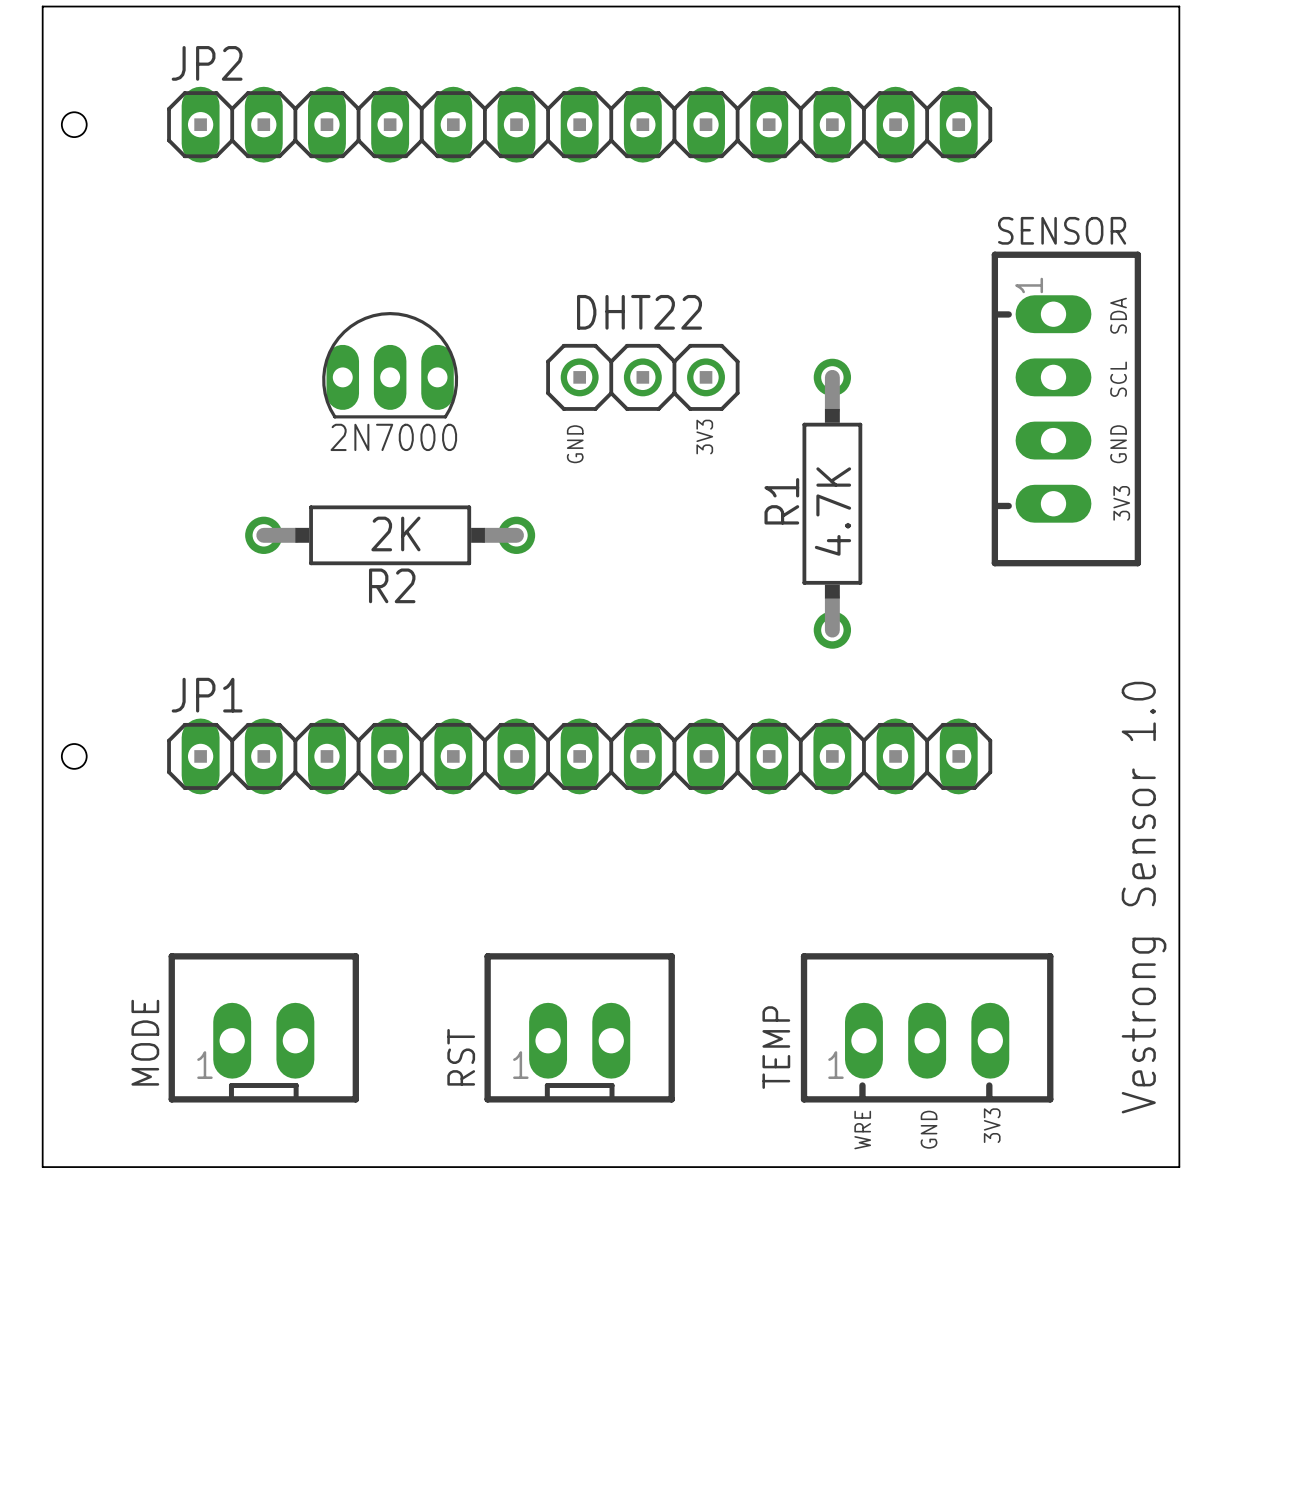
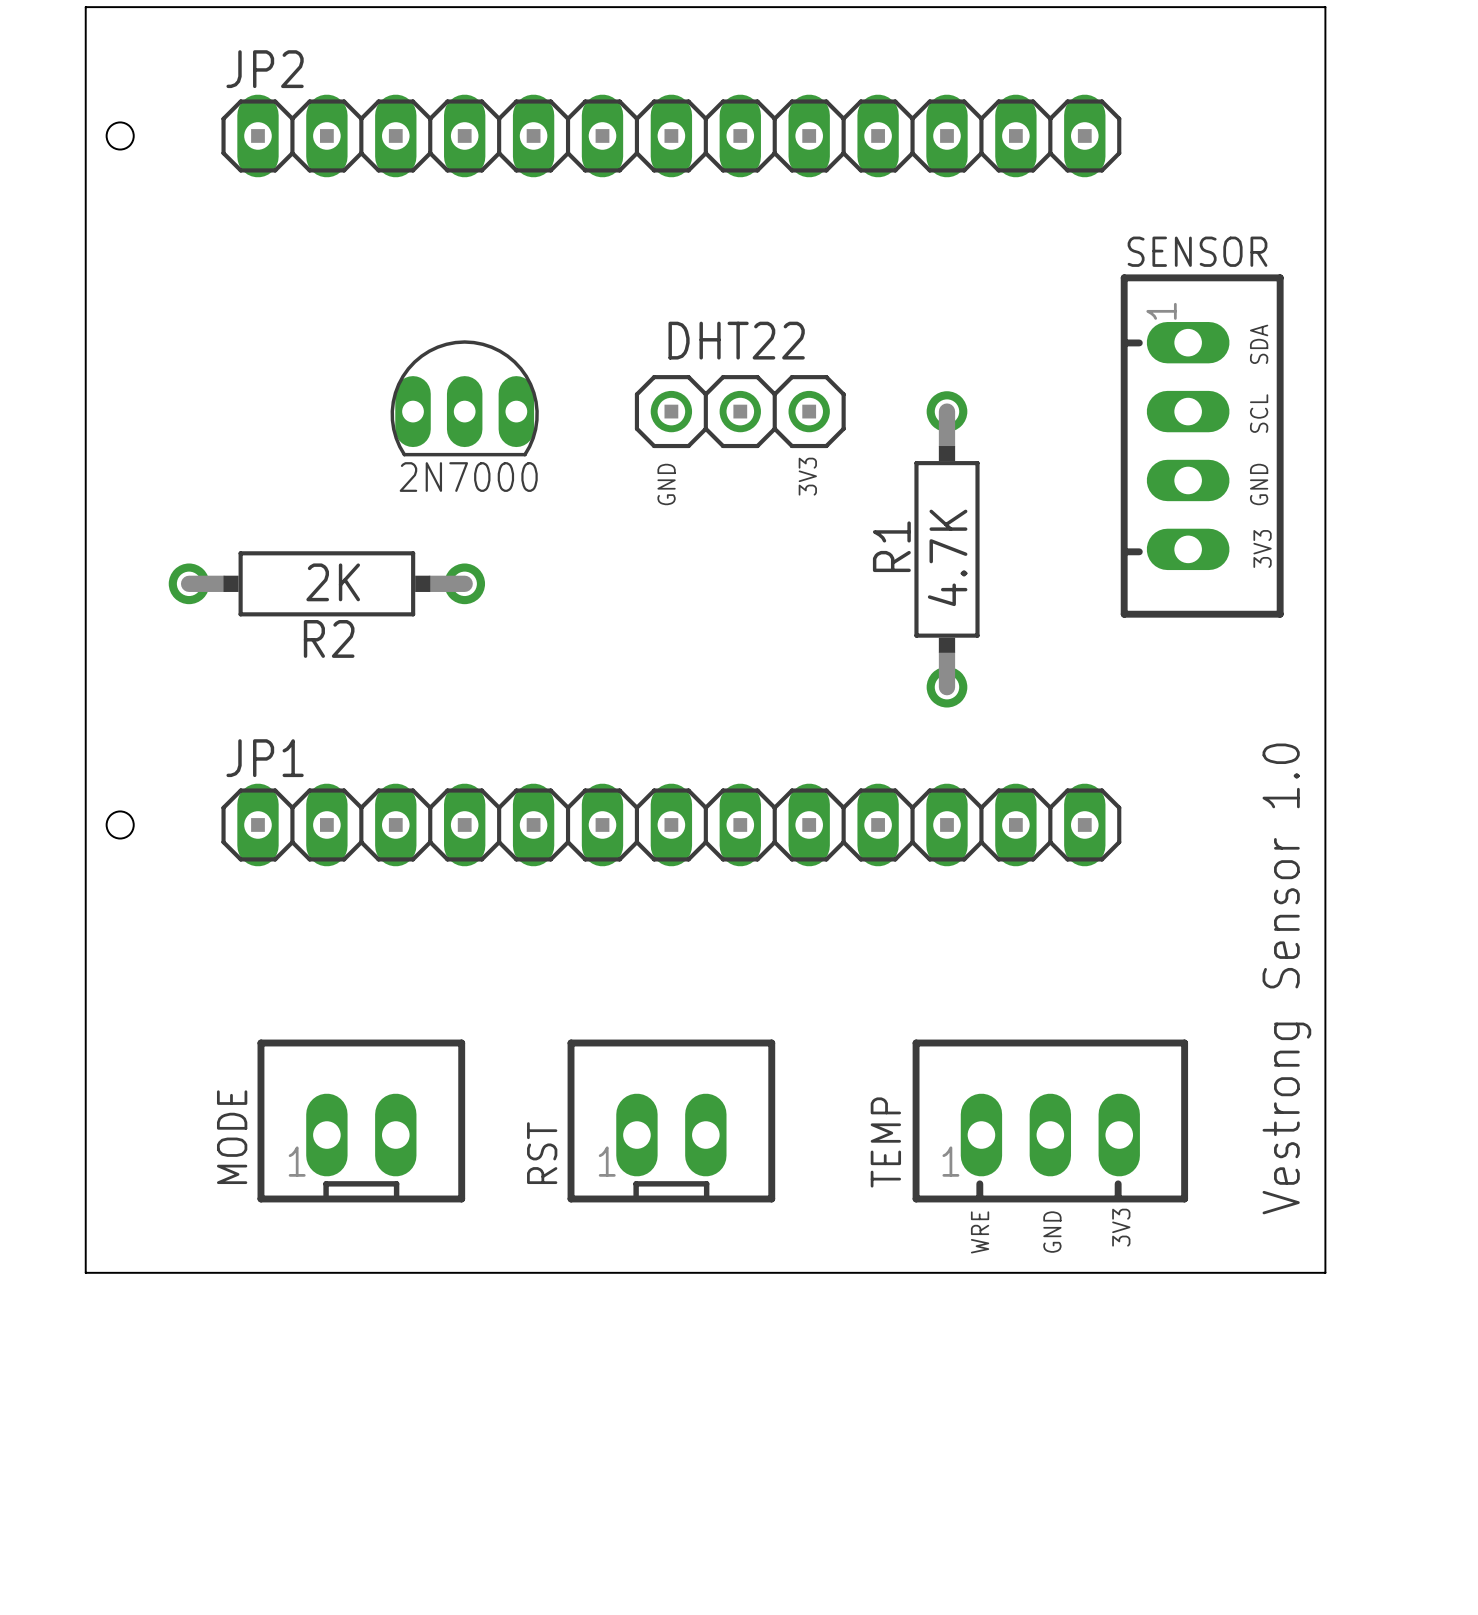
R2 position: (390, 535) -> (326, 583)
MODE position: (263, 1027) -> (361, 1120)

